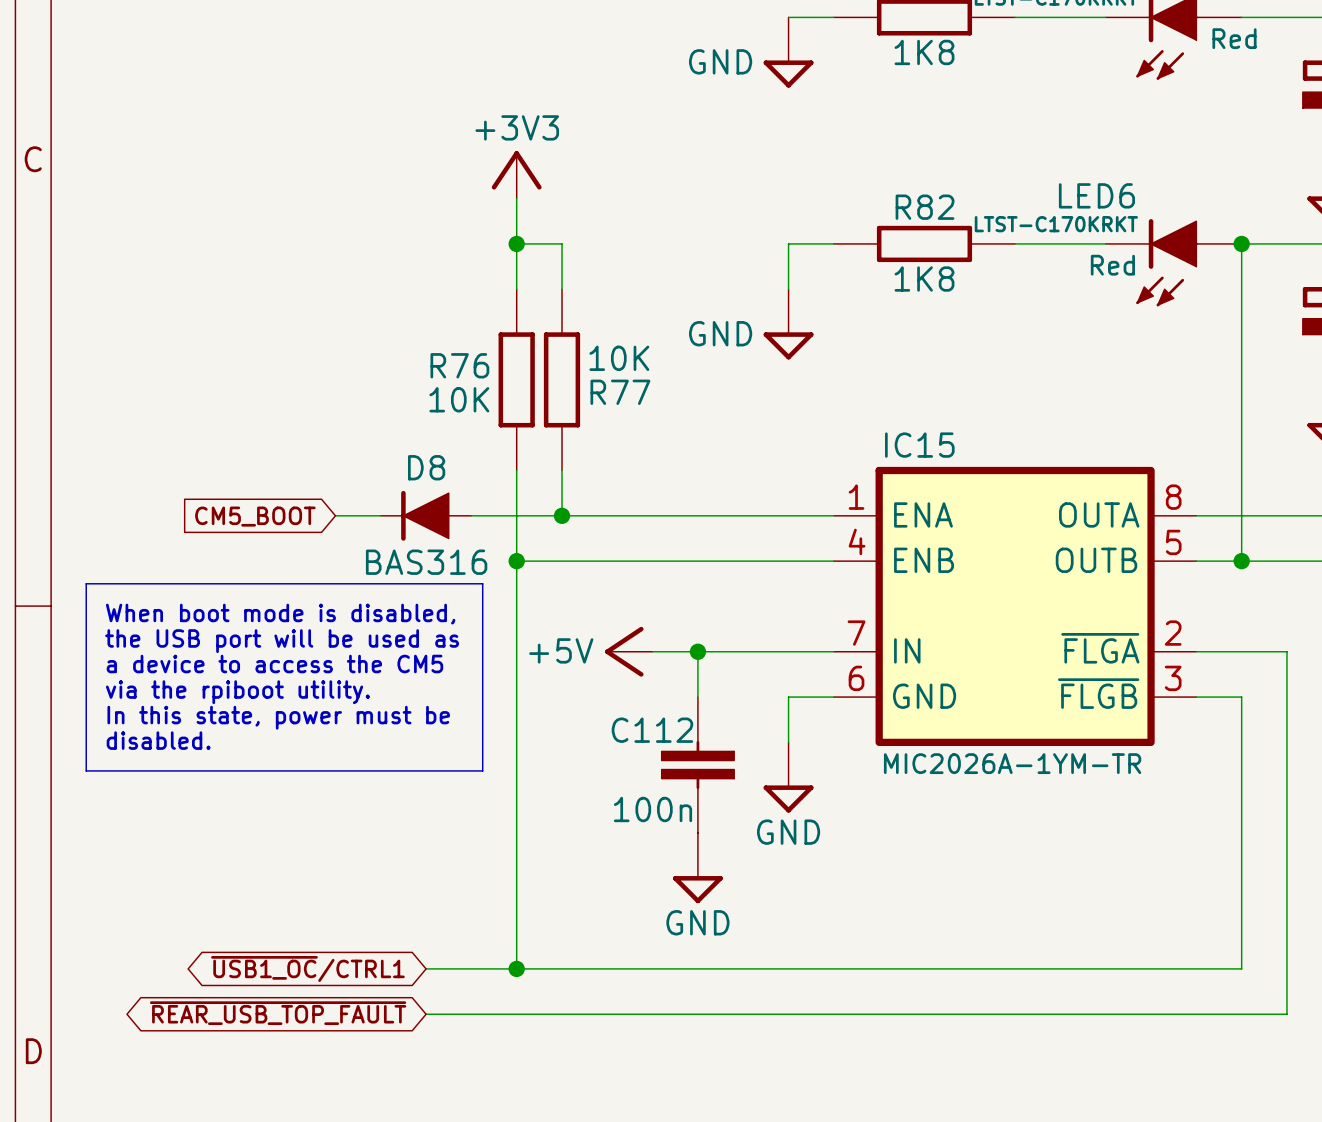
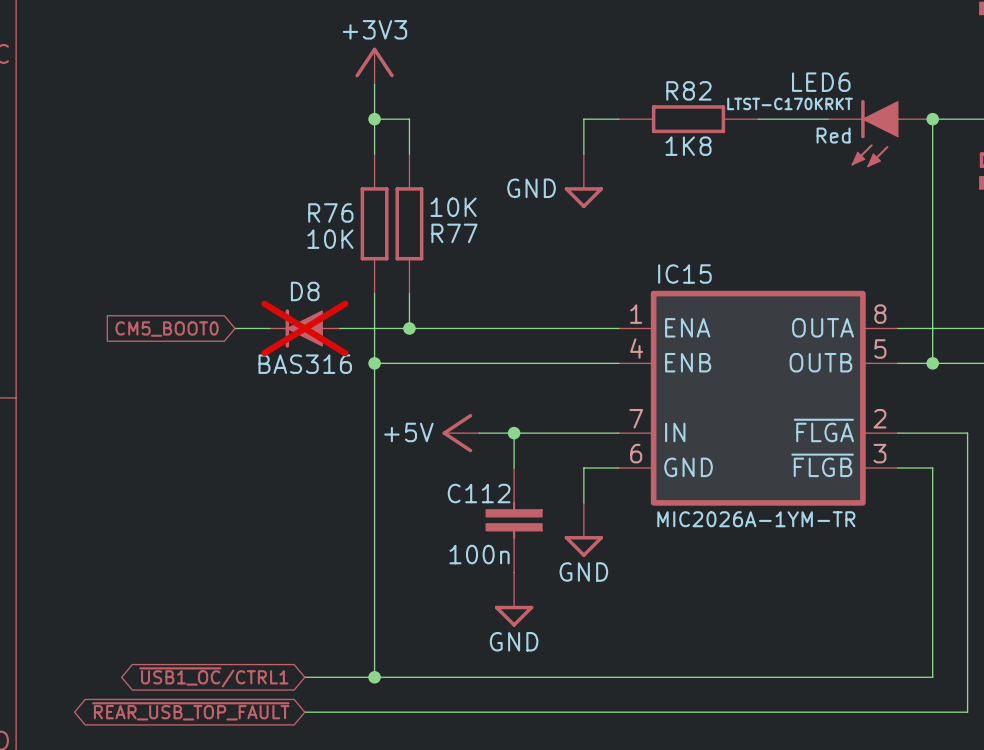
D8 do-not-place cross: none -> (304, 328)
global label: CM5_BOOT (255, 516) -> CM5_BOOT0 (167, 329)
line: (86, 583) (482, 583) (482, 770) (86, 770) (86, 583) -> none
text: When boot mode is disabled, (280, 614) -> none
text: the USB port will be used as (282, 641) -> none
text: a device to access the CM5 (274, 664) -> none
text: via the rpiboot utility. (237, 692) -> none
text: In this state, power must be (278, 717) -> none
text: disabled. (158, 740) -> none

